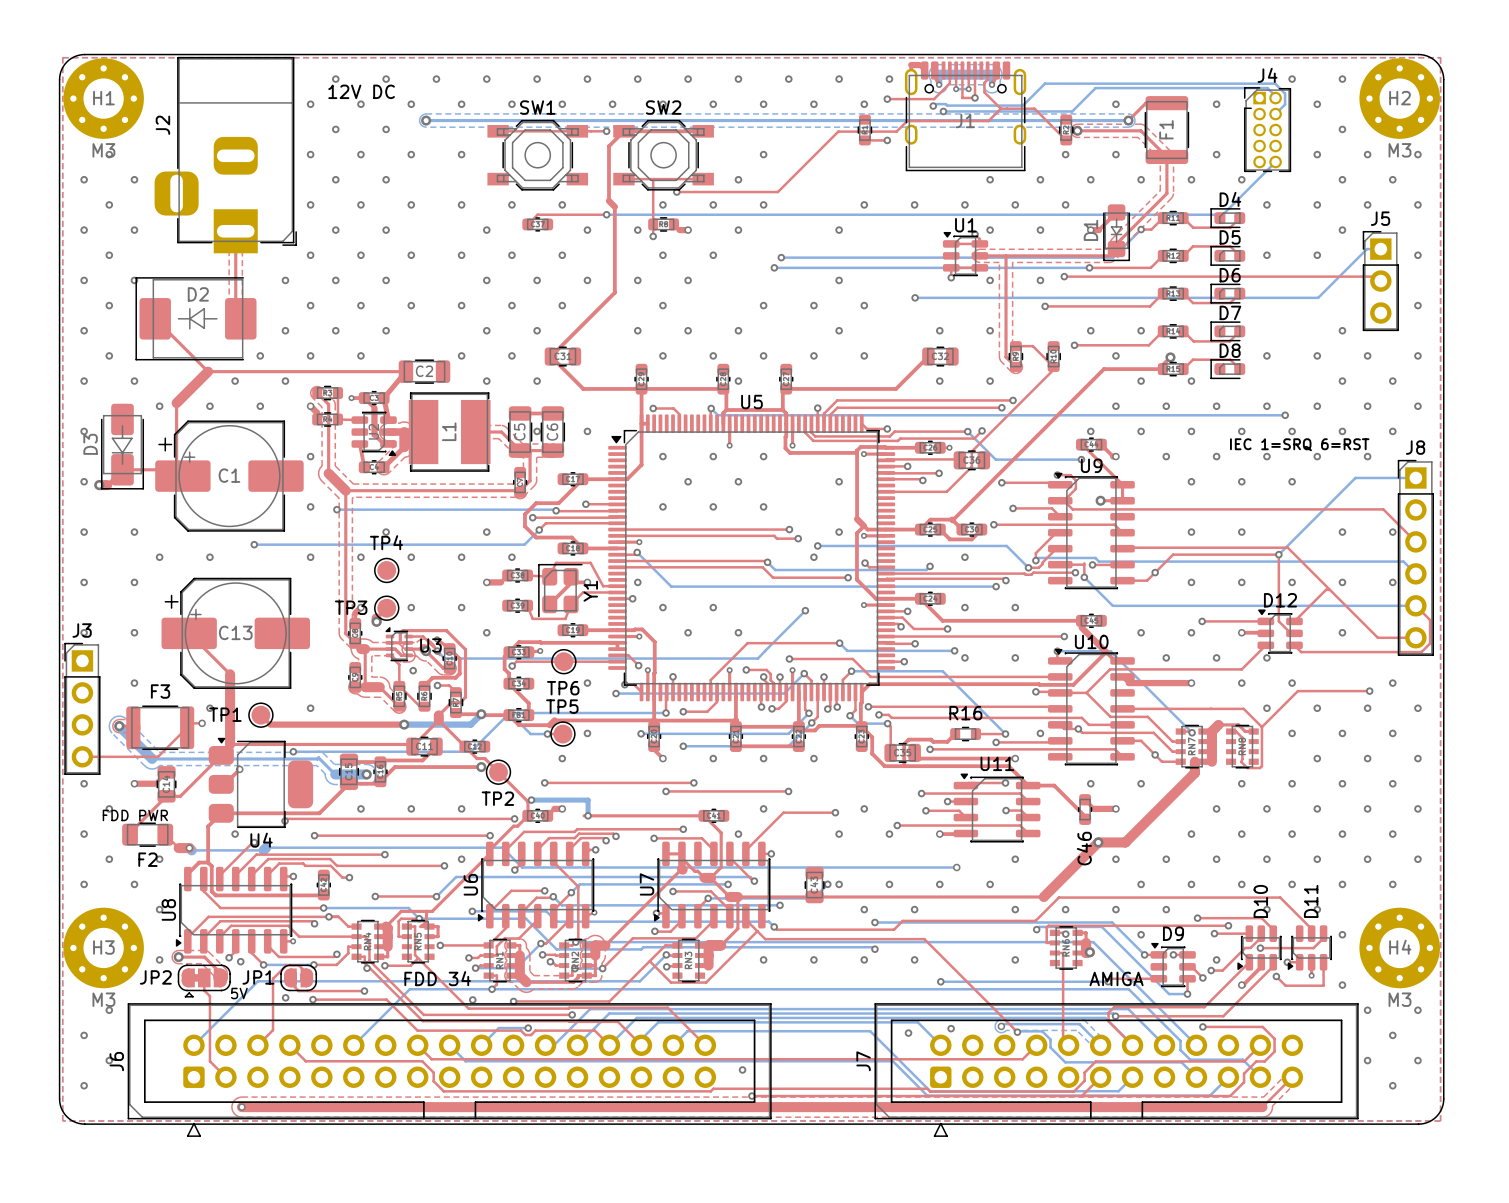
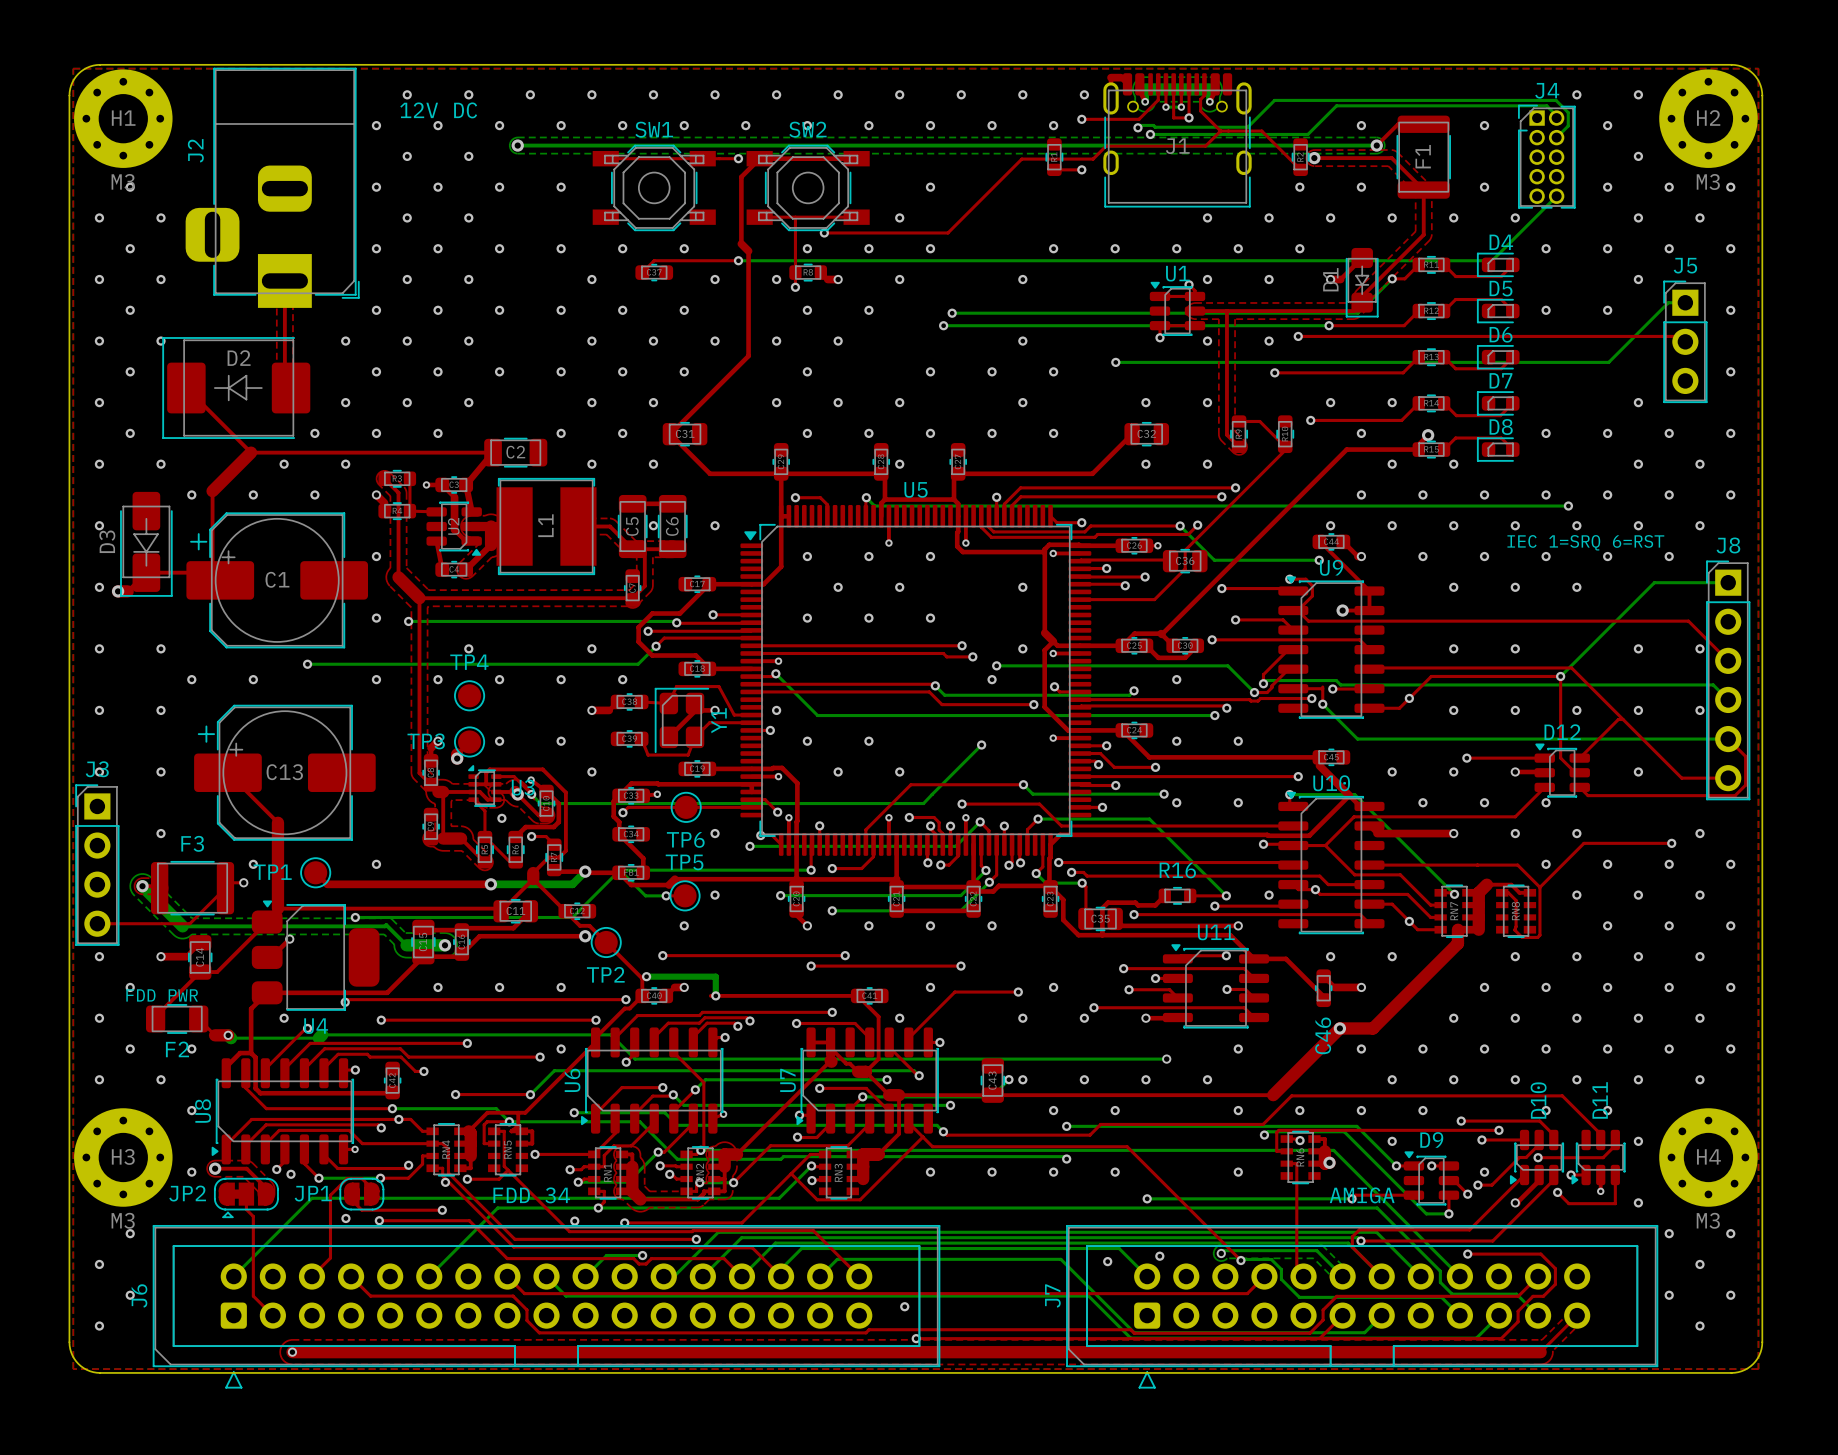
text: 5V (239, 993) -> none

